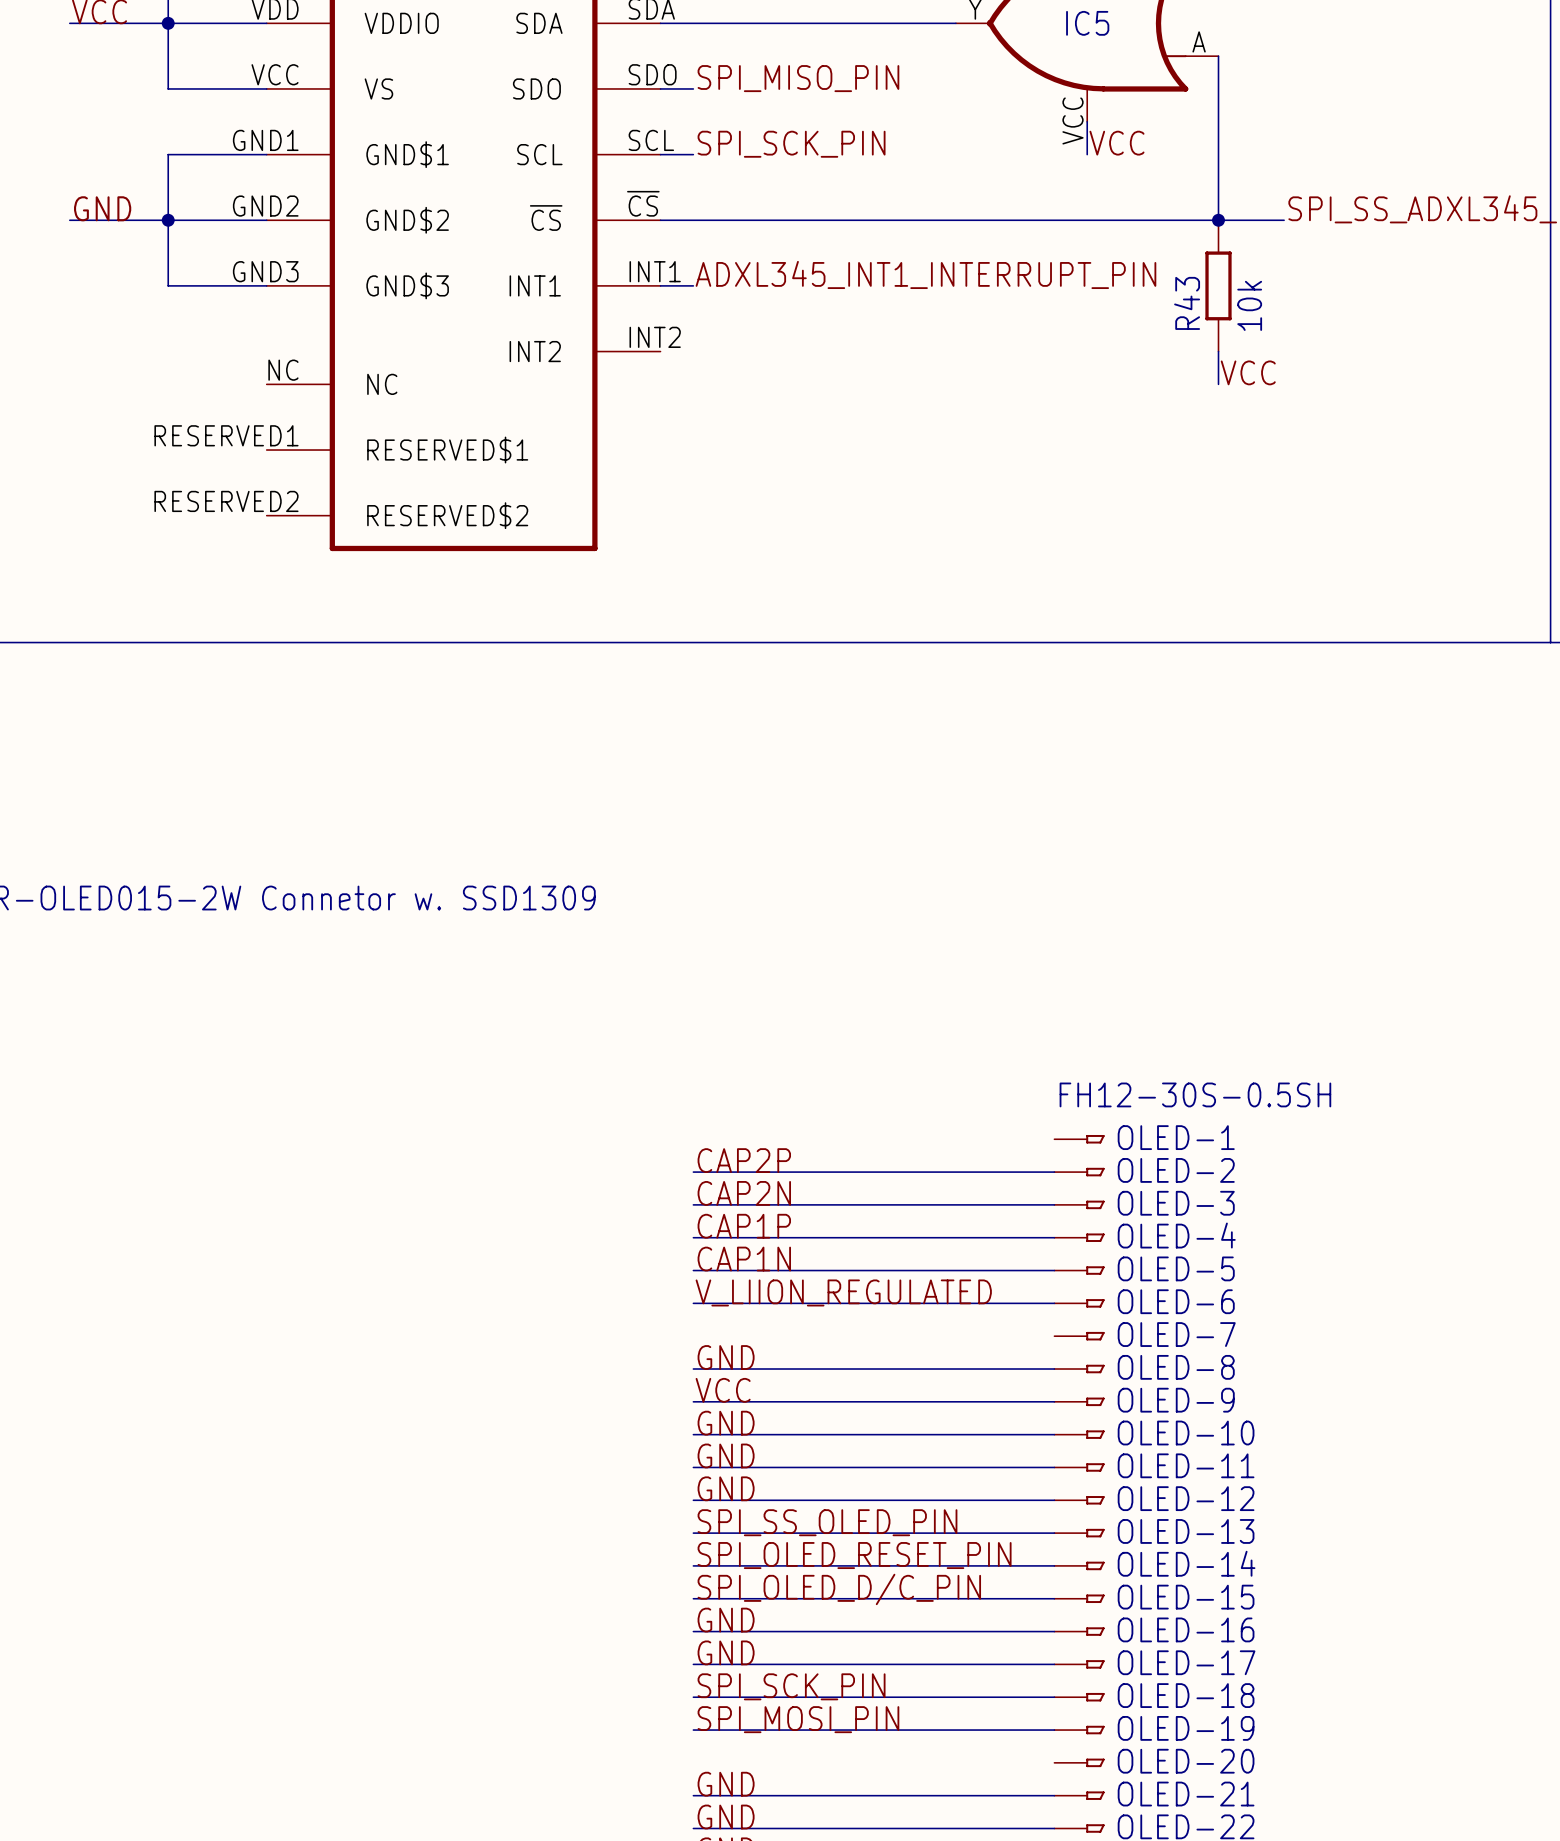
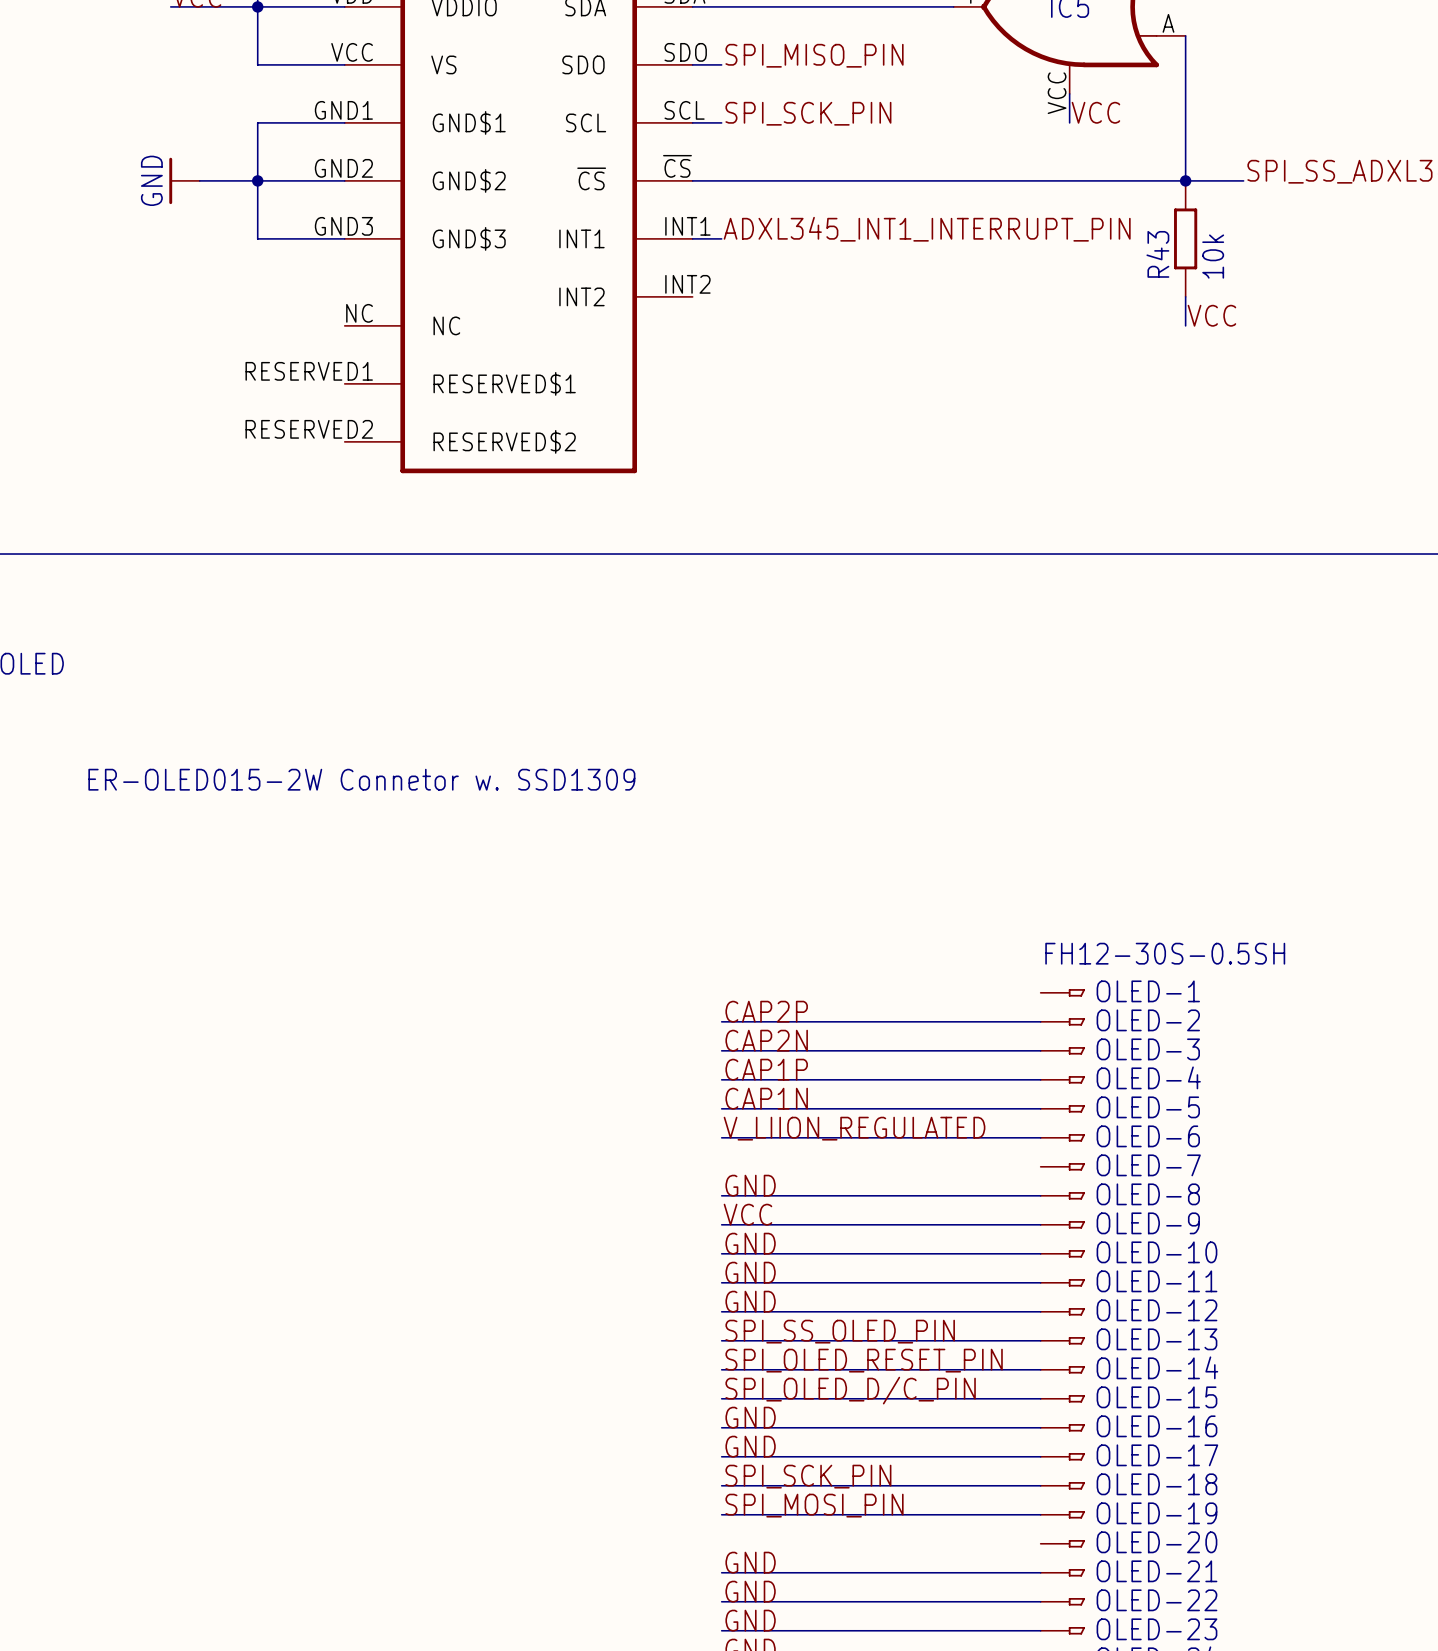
label: GND (102, 208) -> none
power symbol: none -> GND (184, 180)

